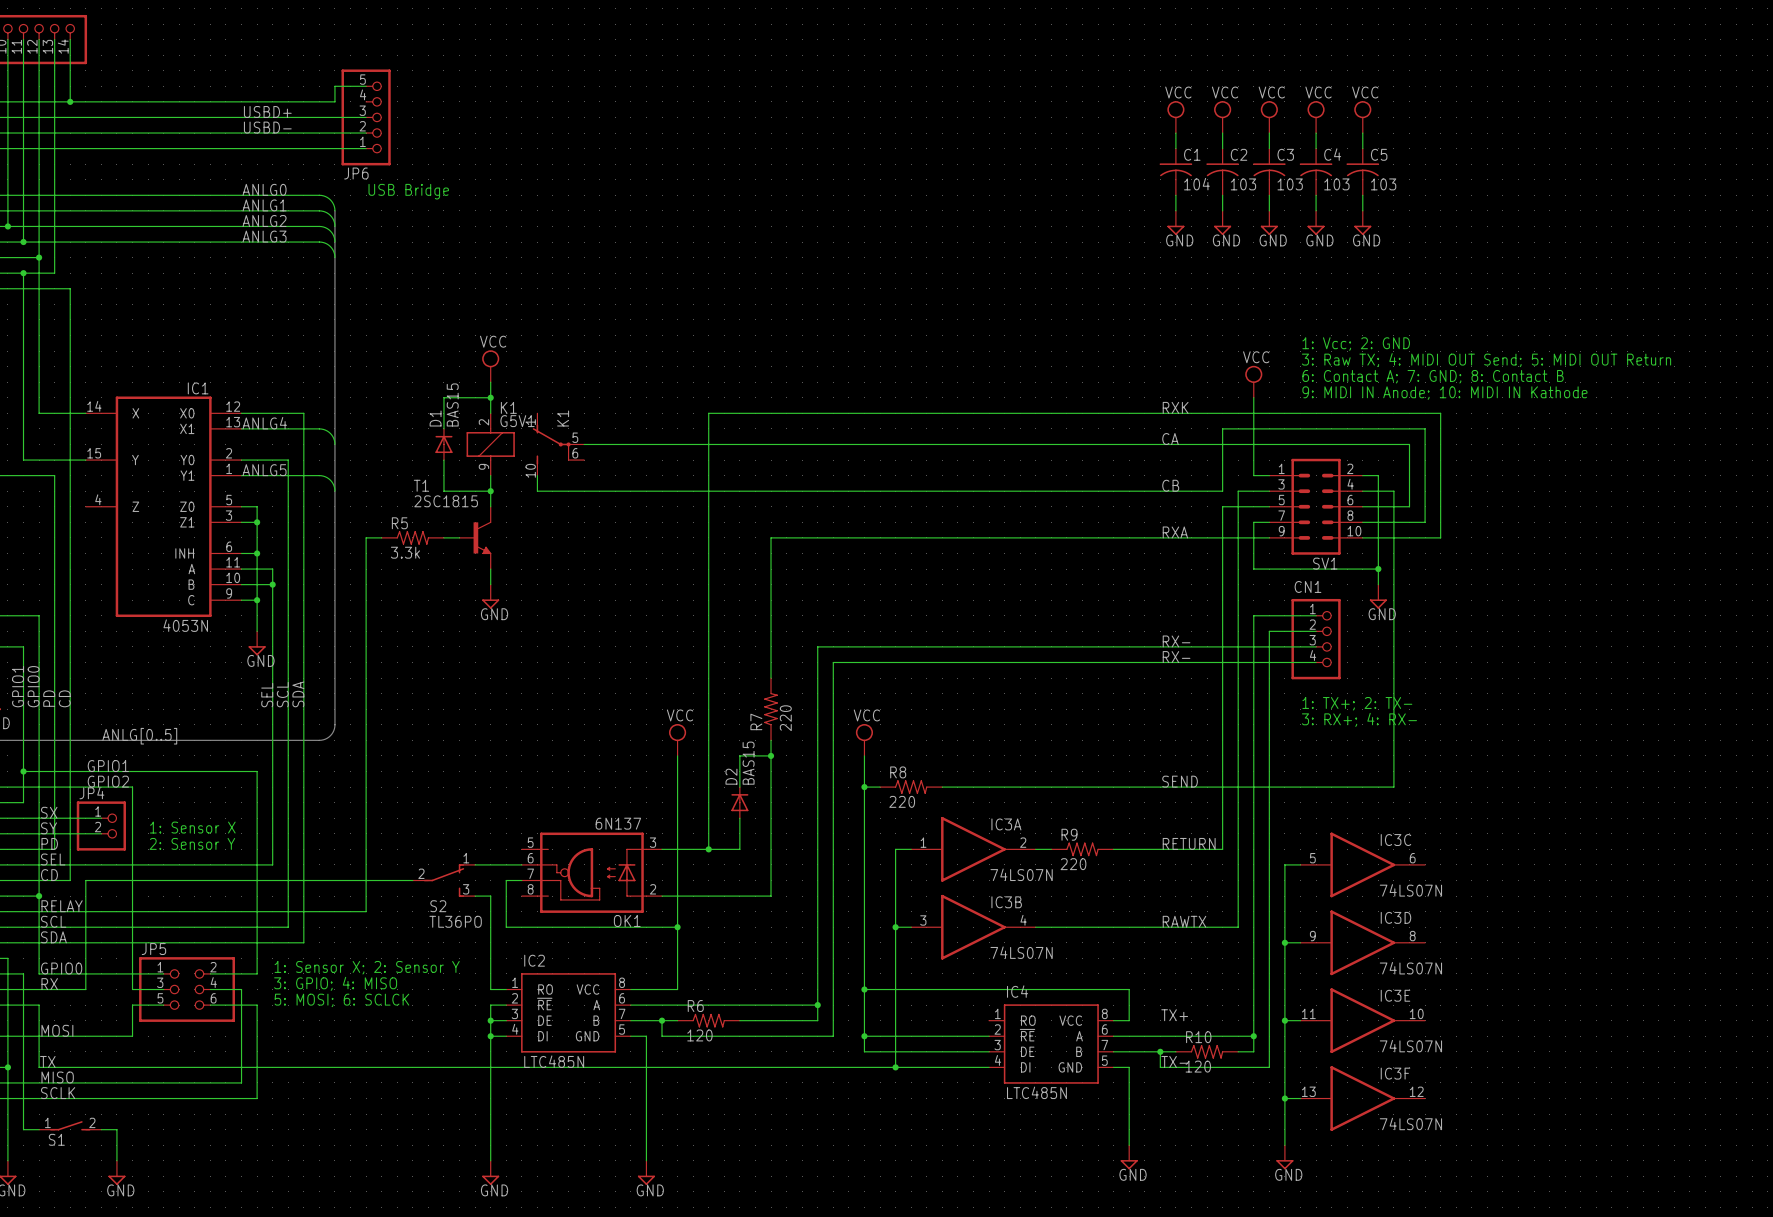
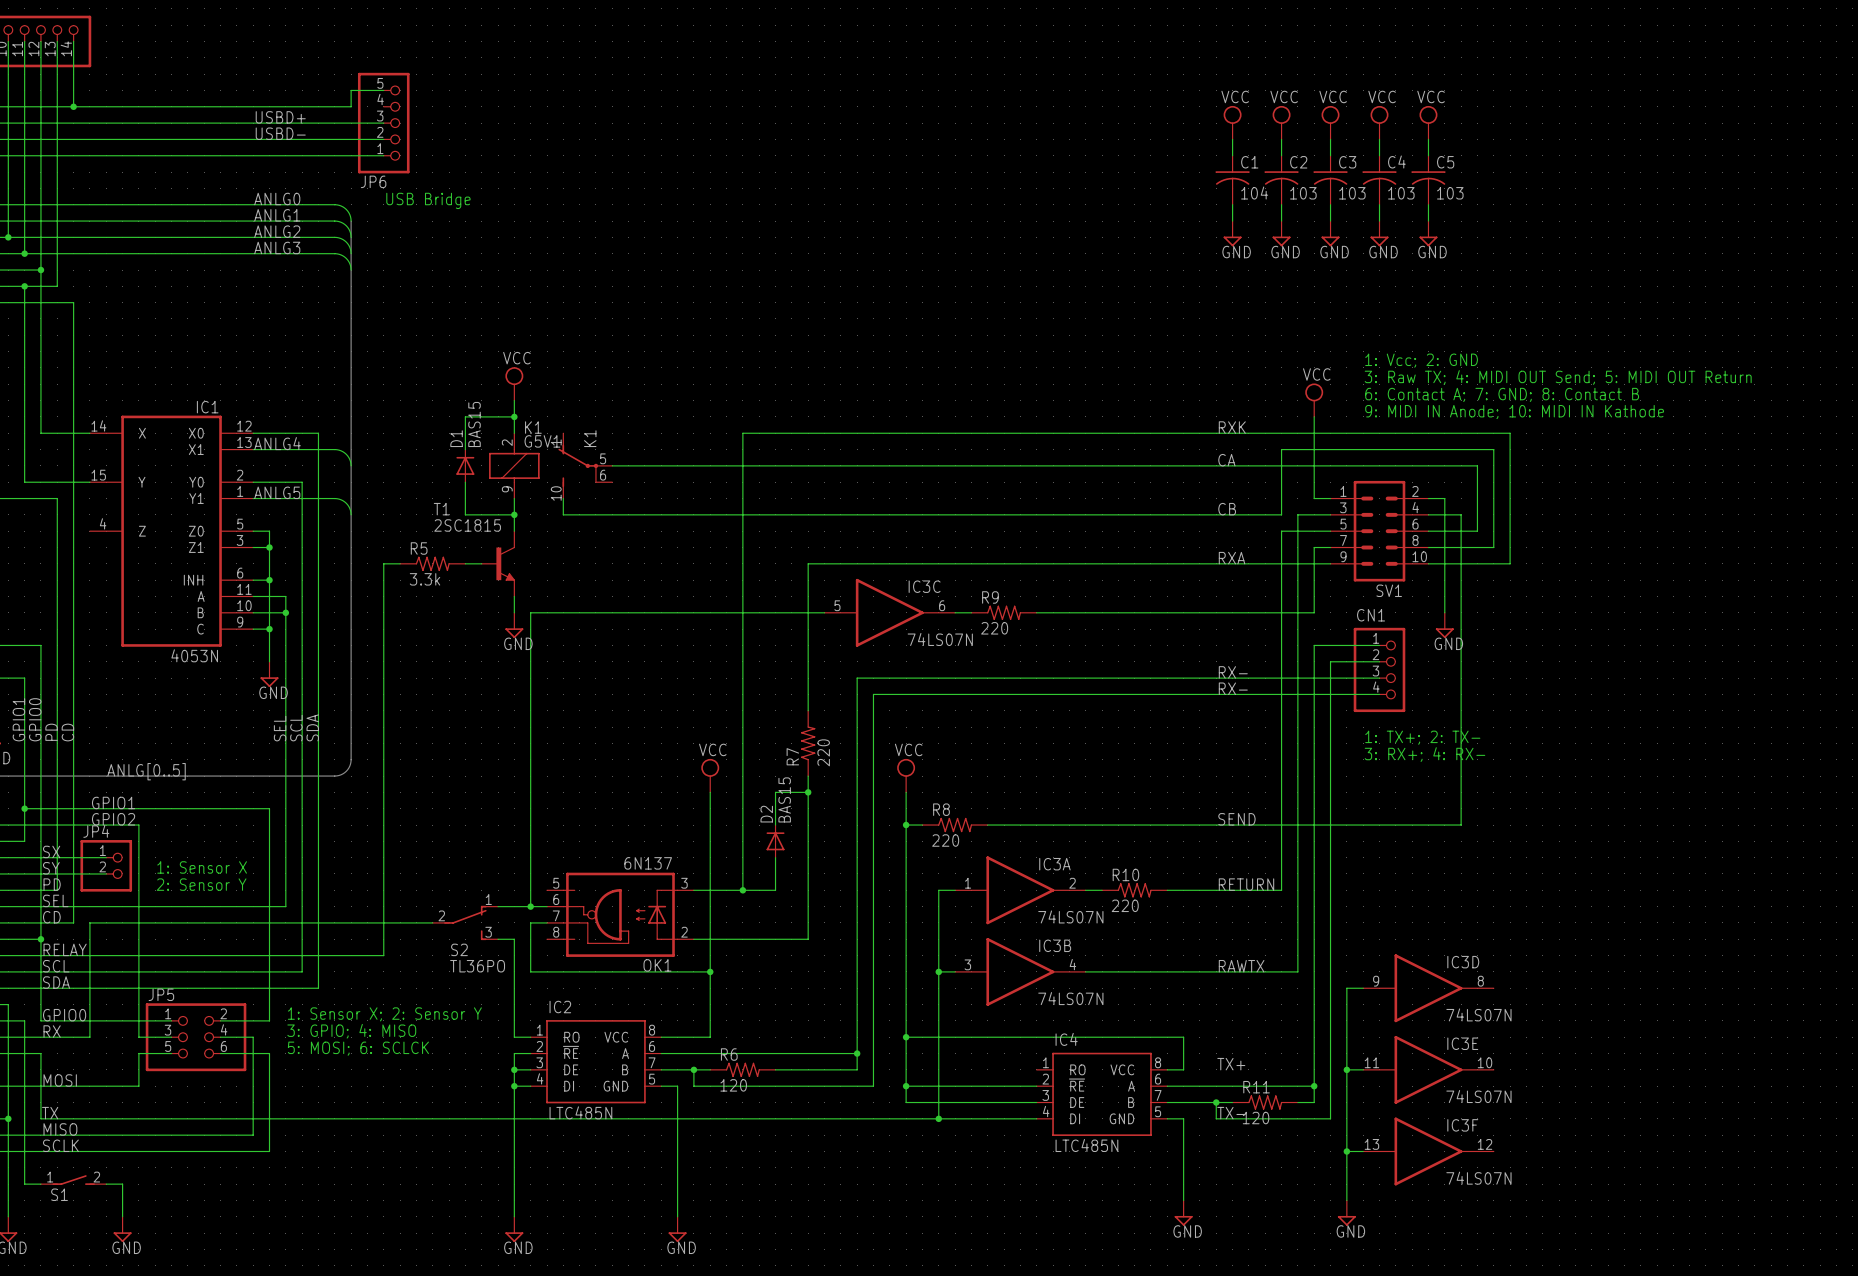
wire: (1253, 569) (1378, 569) -> (1314, 596) (1314, 612) (1036, 612)
junction: (1378, 569) -> none
wire: none -> (824, 612) (530, 612) (530, 906)
wire: none -> (955, 612) (971, 612)
R9: none -> 220 (1004, 612)
R9 name: R9 (1069, 834) -> R10 (1125, 874)
junction: none -> (530, 906)
wire: (1300, 864) (1284, 864) (1284, 942) -> none
IC3C position: (1362, 864) -> (889, 612)
junction: (1284, 942) -> none
R10 name: R10 (1198, 1037) -> R11 (1256, 1087)

